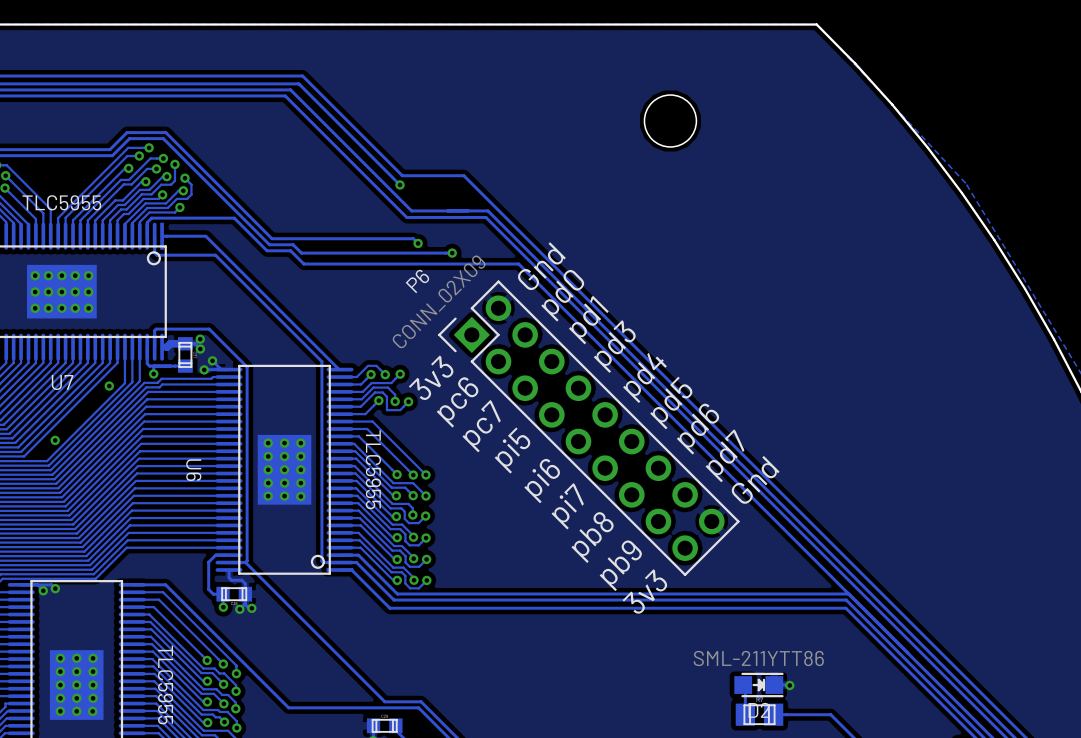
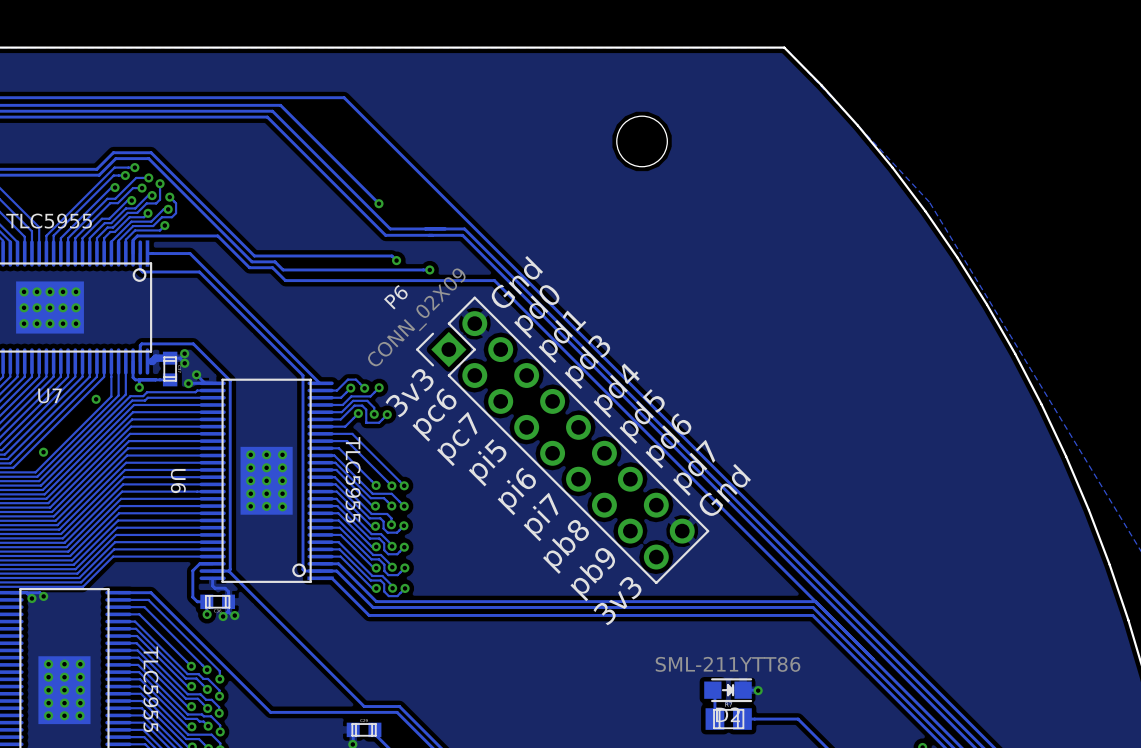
track: (302, 76) (402, 175) (463, 175) -> (284, 97) (344, 97) (441, 194)

